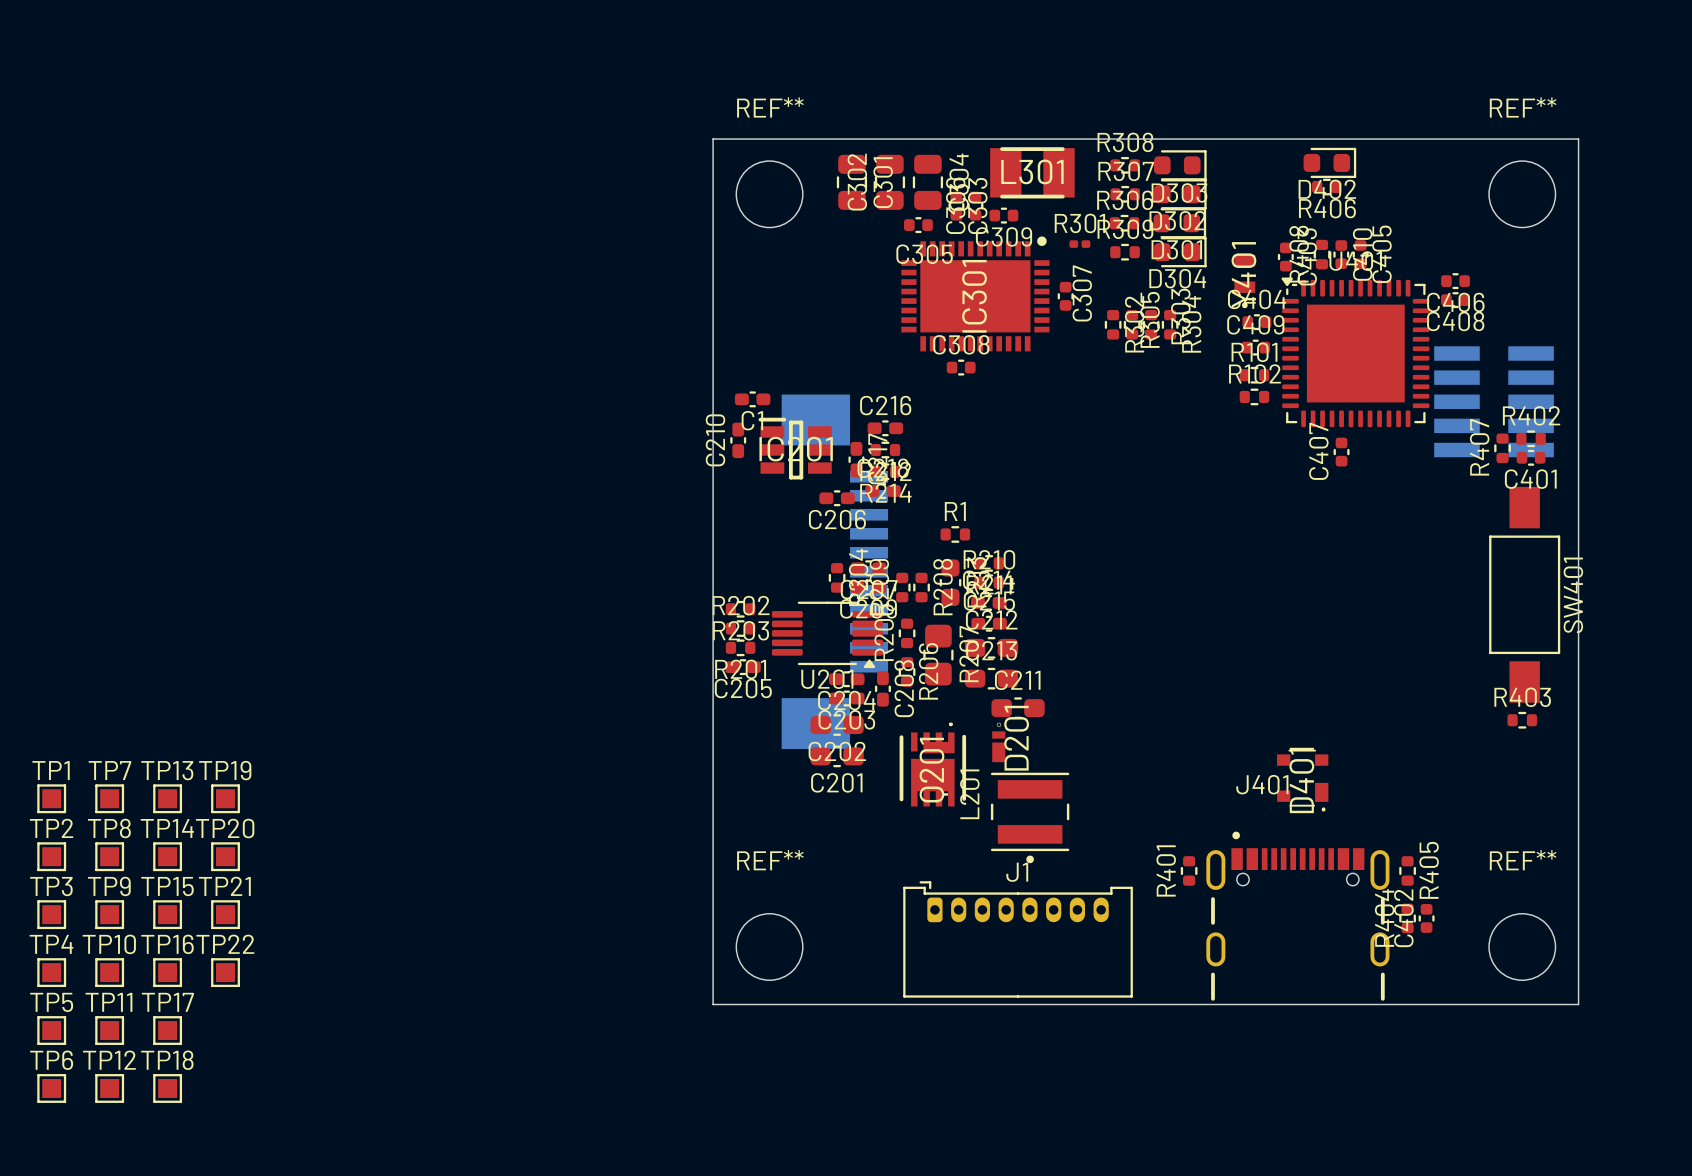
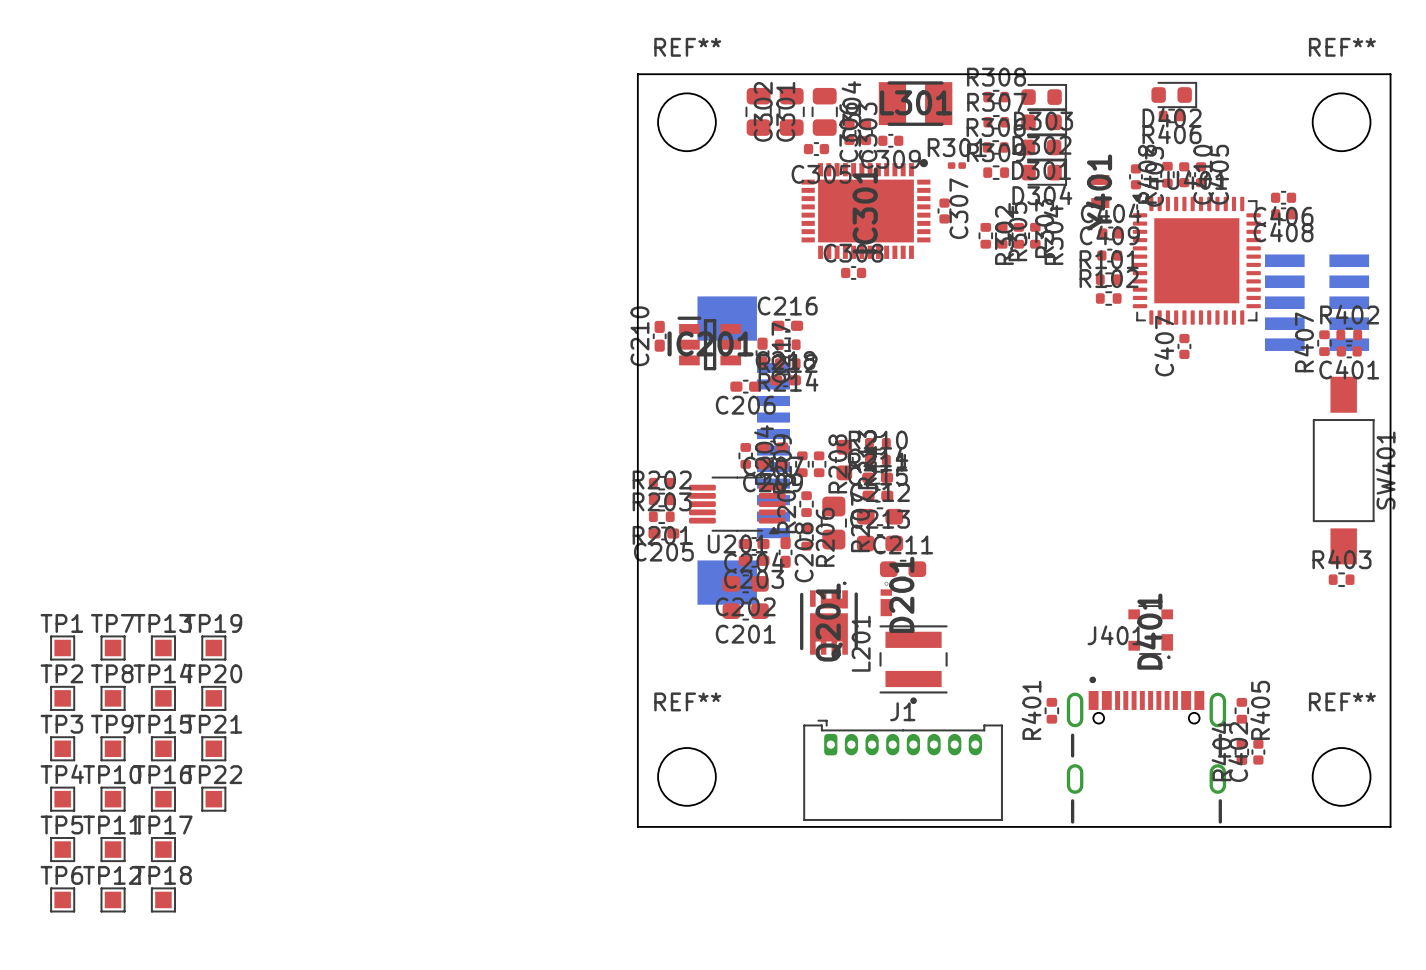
C1: (752, 399) -> none
R1: (955, 534) -> none

